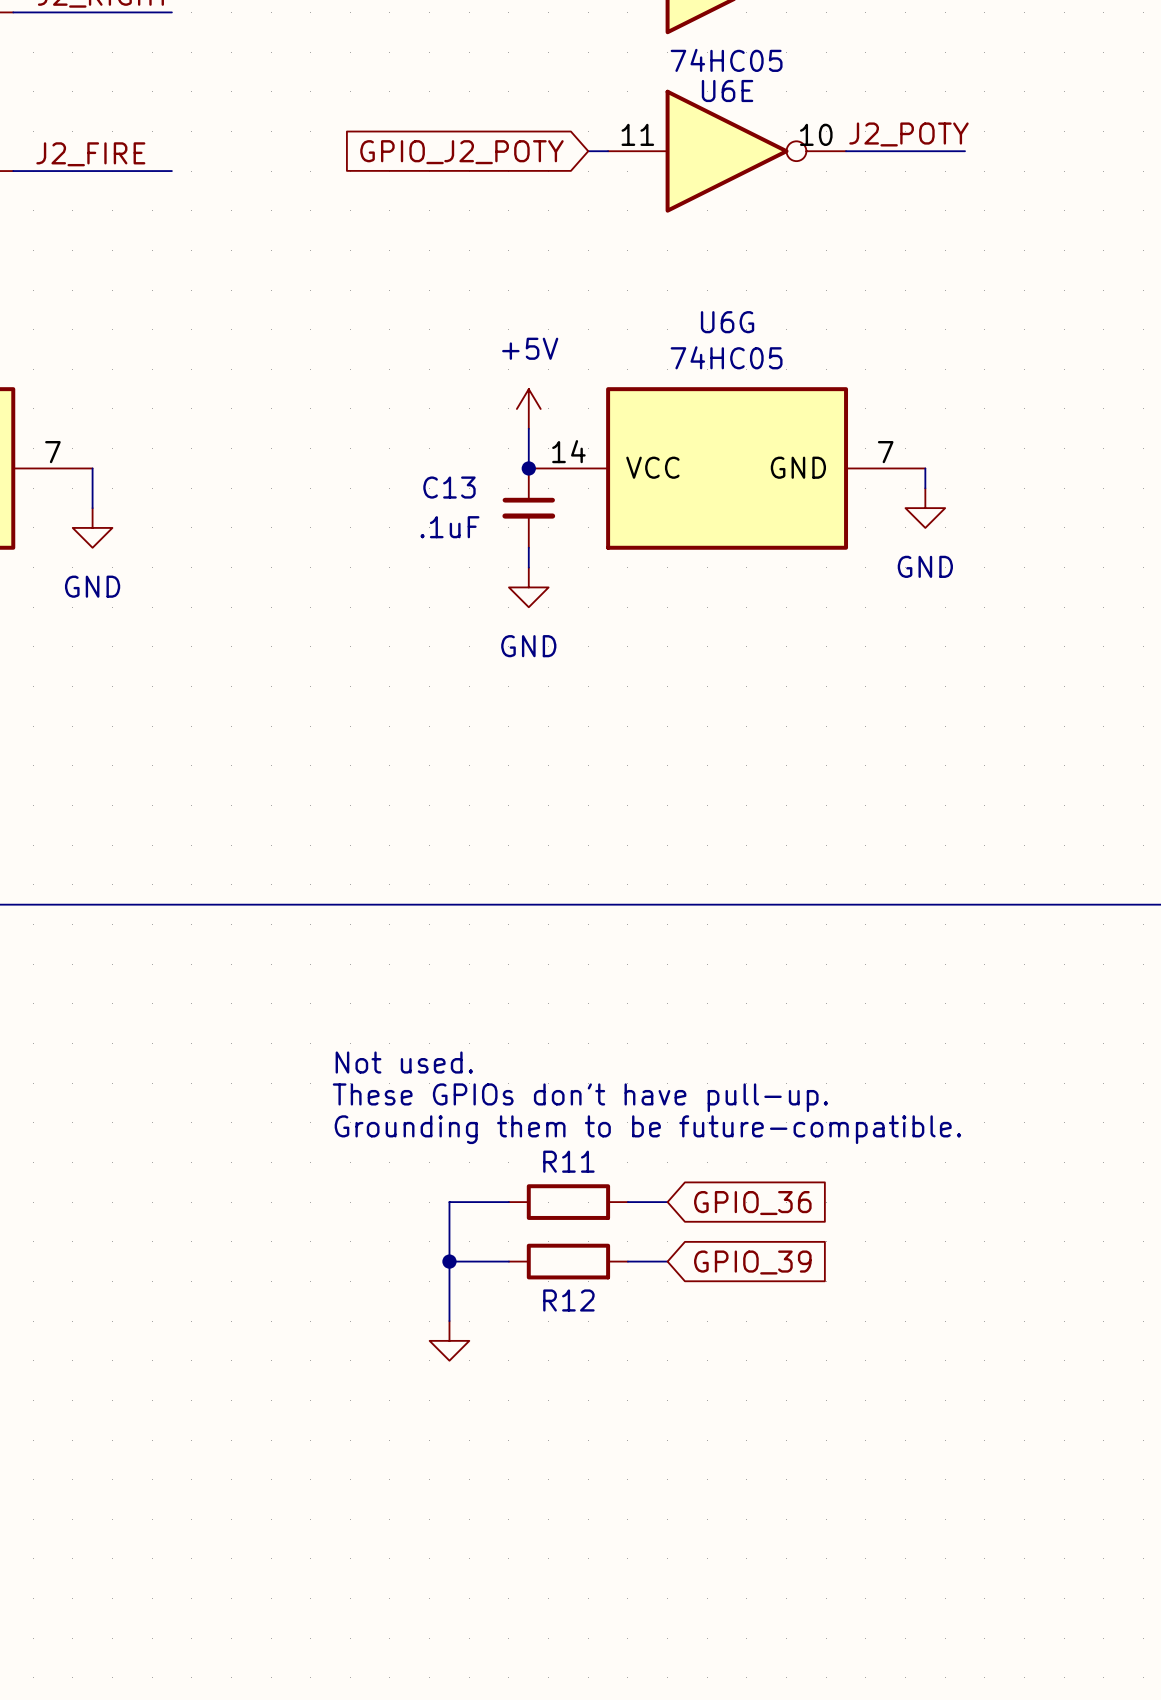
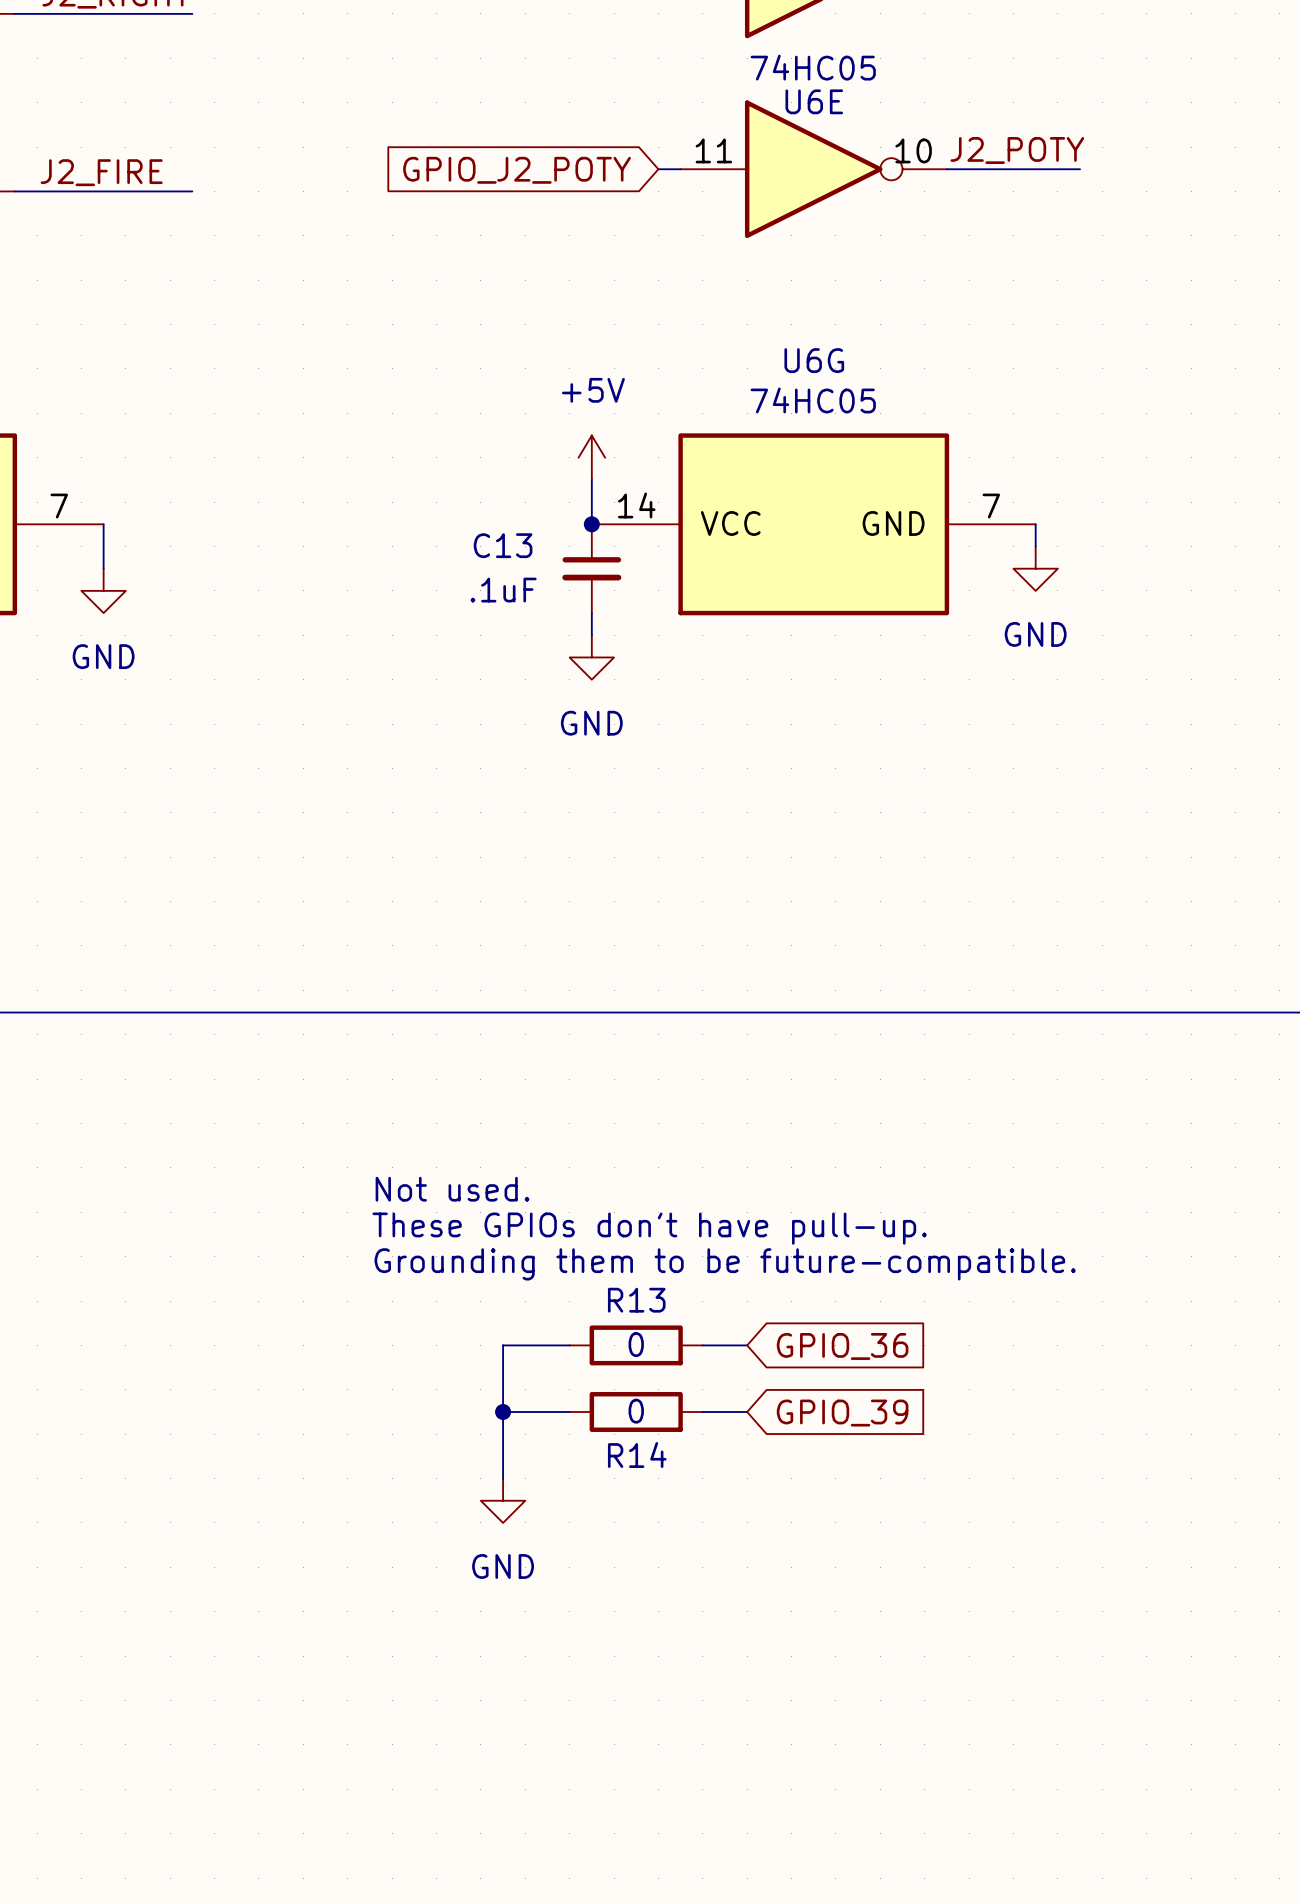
R11 name: R11 (568, 1161) -> R13 (636, 1300)
R11 value: none -> 0 (636, 1344)
R12 value: none -> 0 (636, 1411)
R12 name: R12 (568, 1300) -> R14 (637, 1455)
power symbol text: none -> GND (503, 1566)

